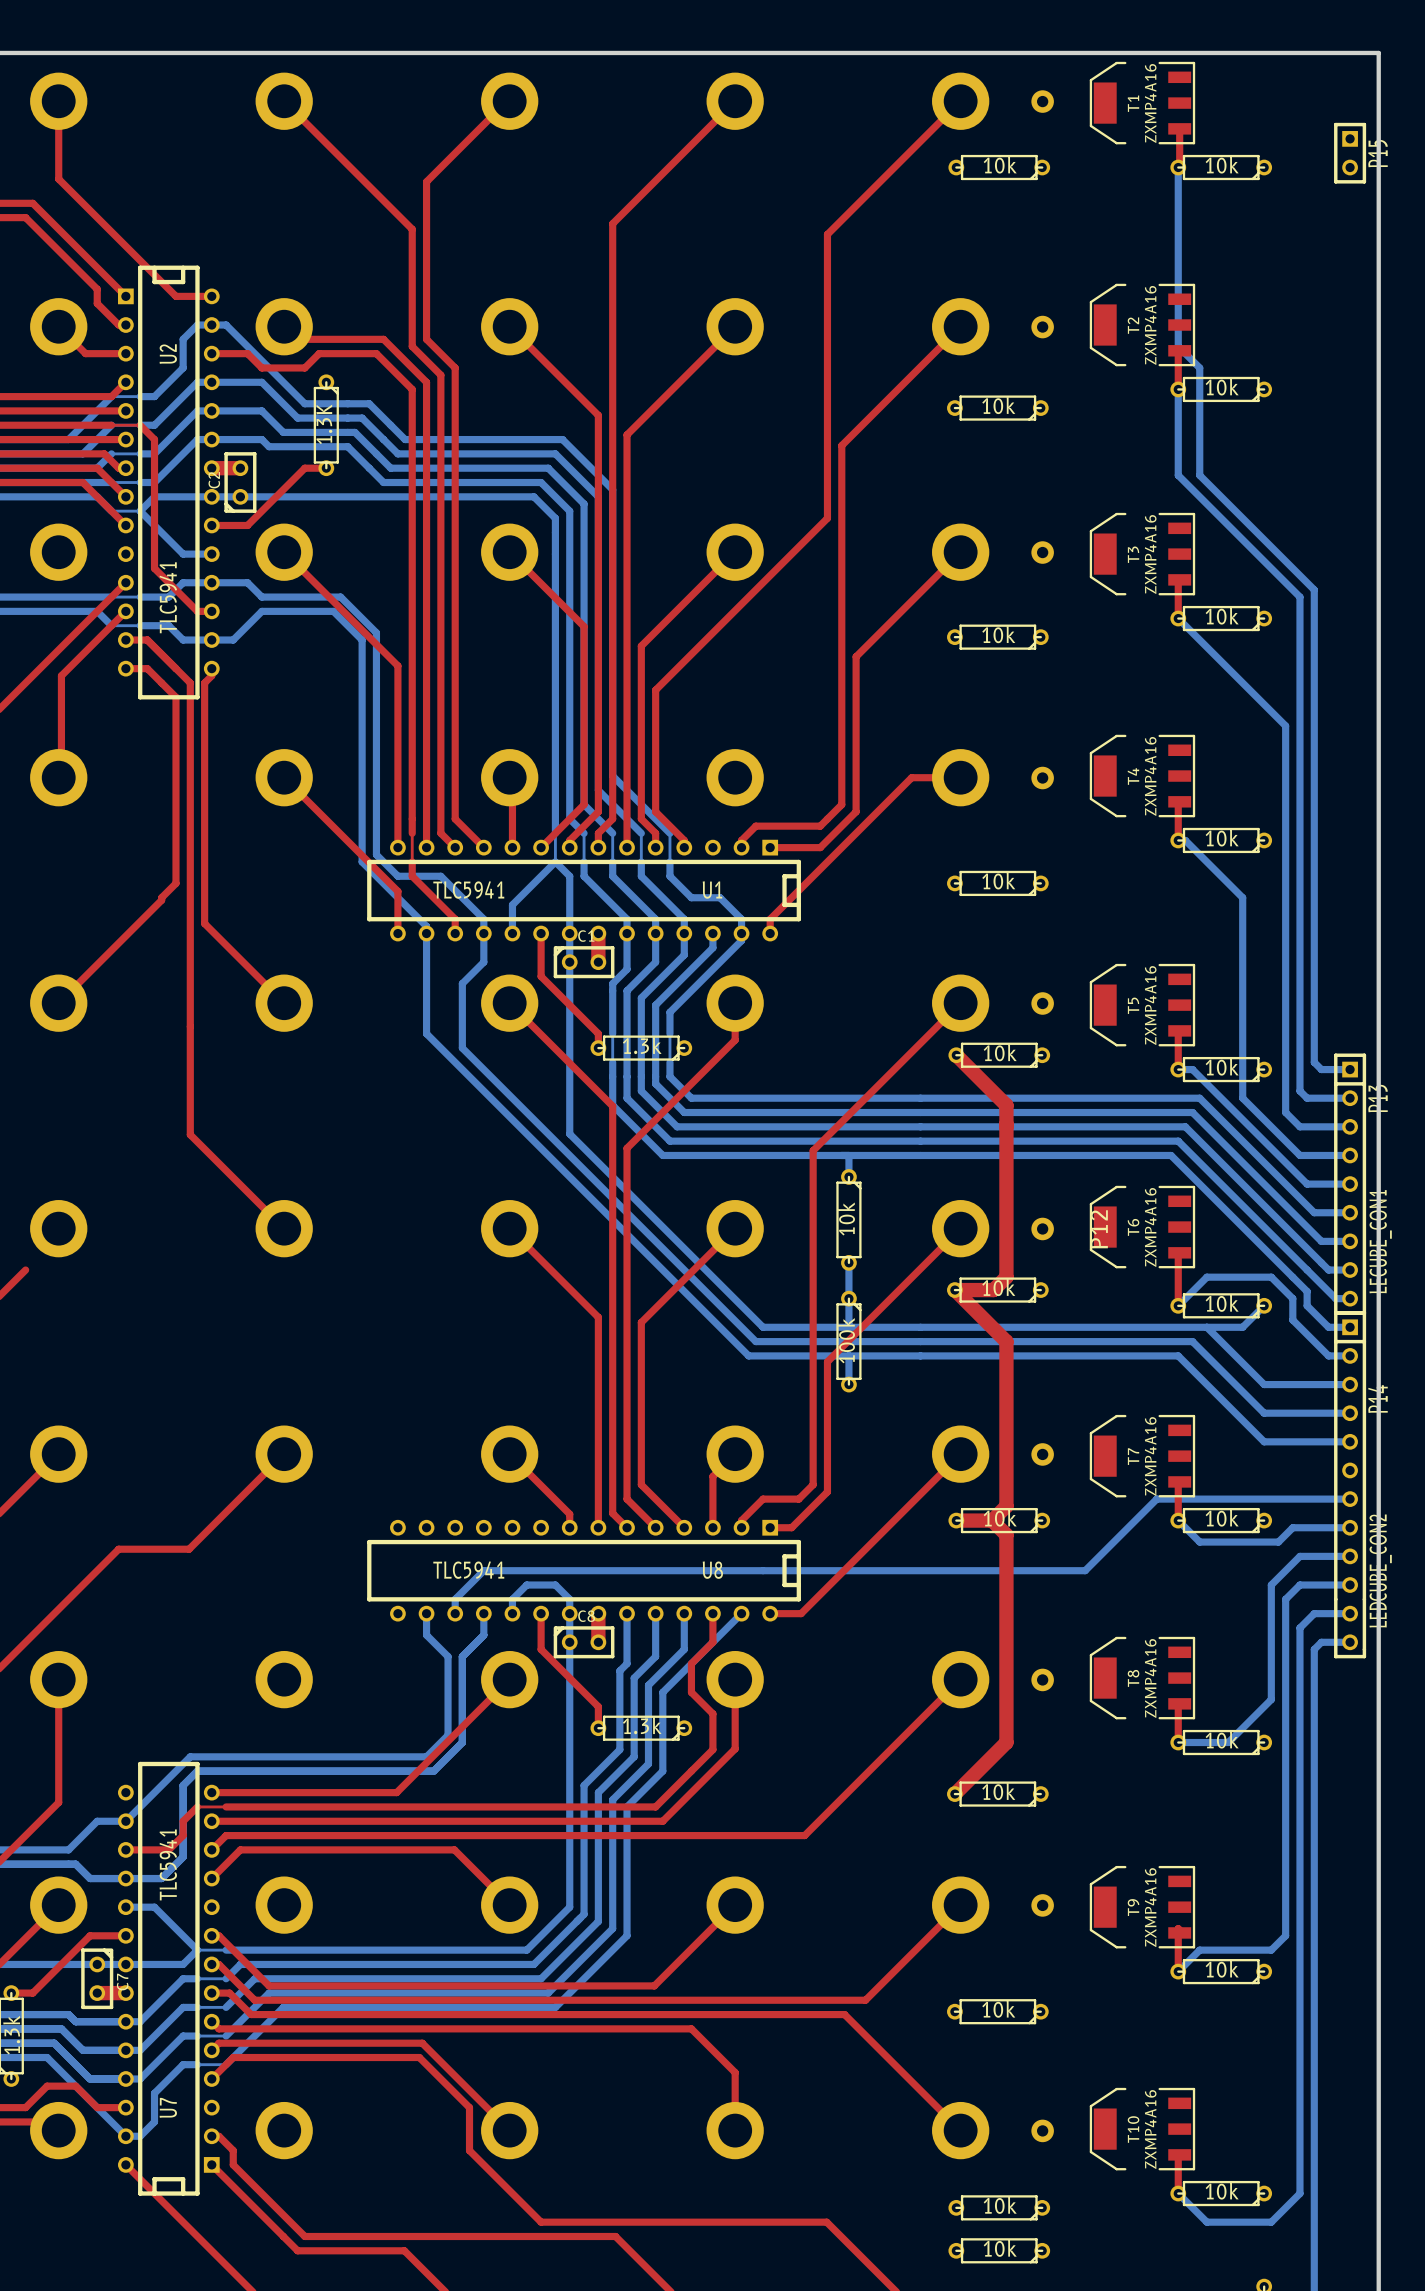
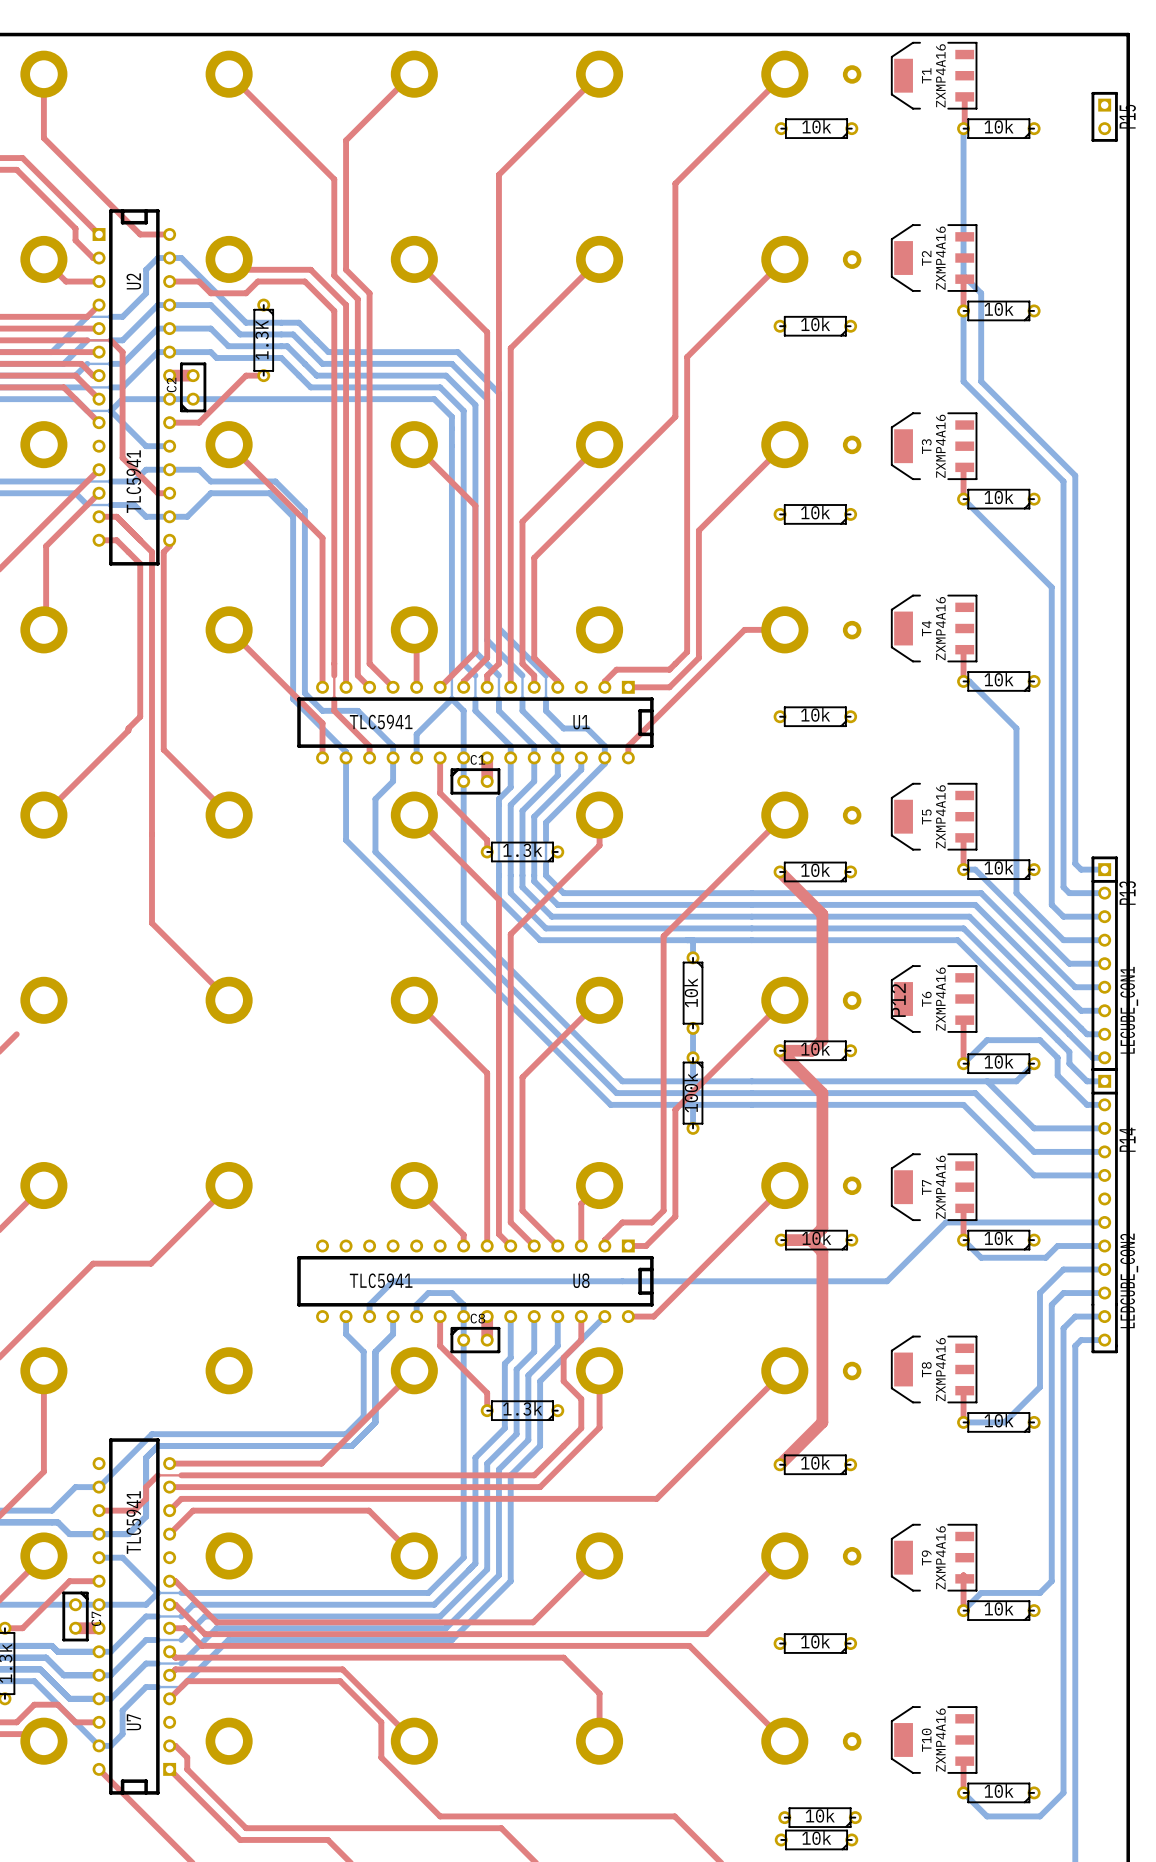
top track: (956, 1055) (1006, 1105) (1006, 1123) -> (780, 871) (822, 914)
part position: (999, 1055) -> (815, 871)
part position: (999, 2207) -> (820, 1817)

